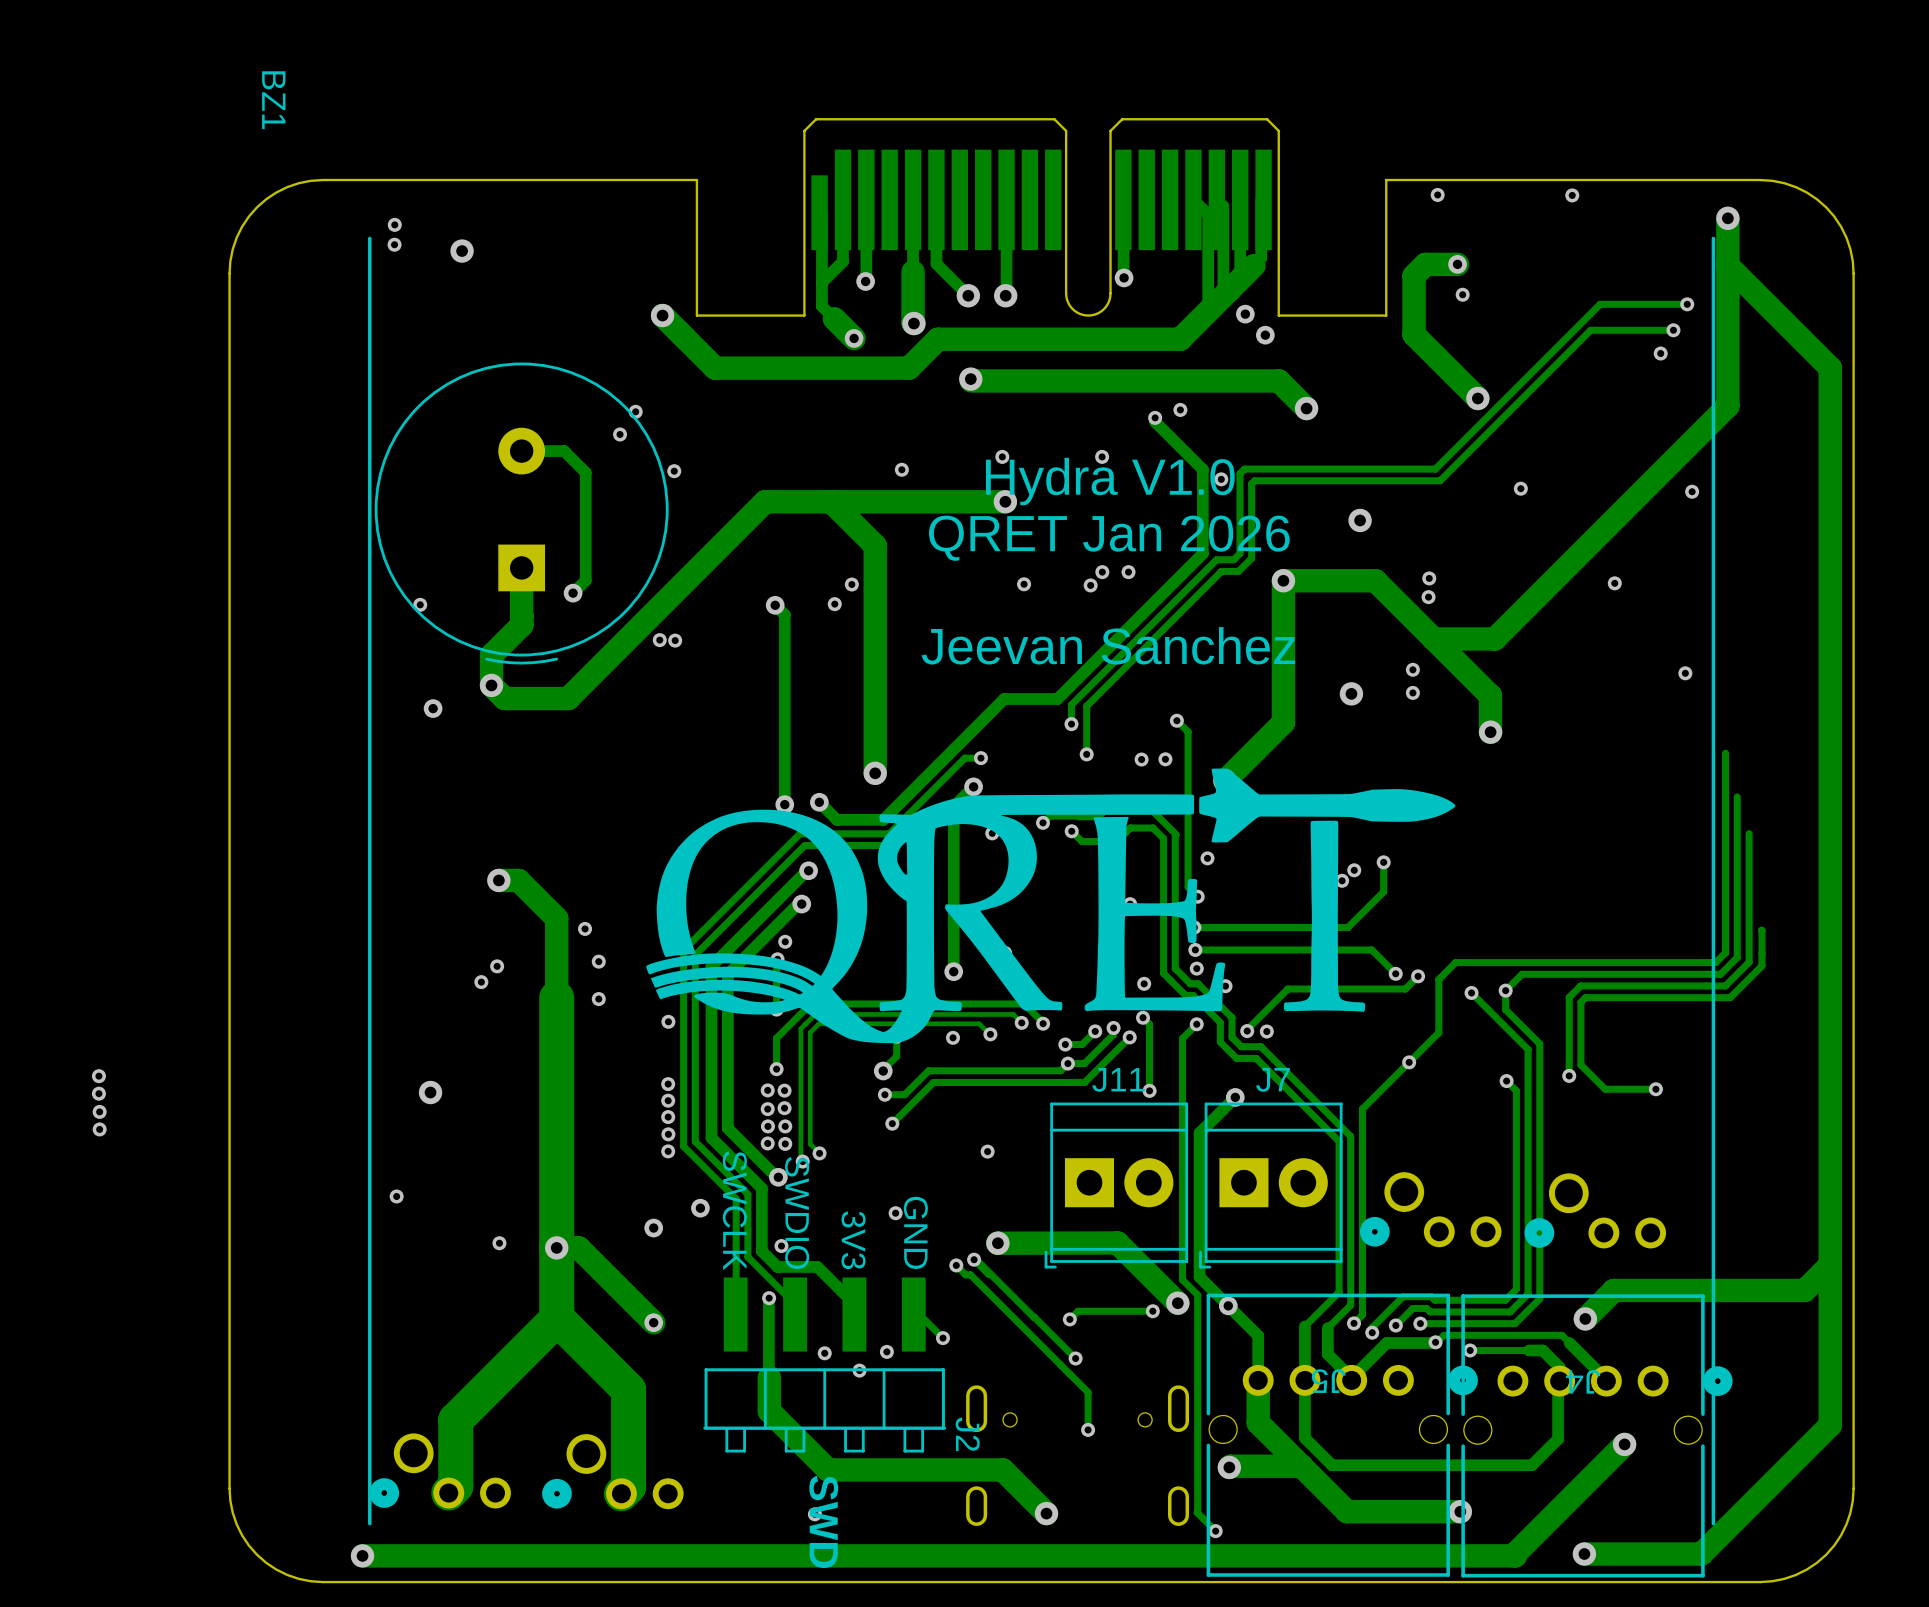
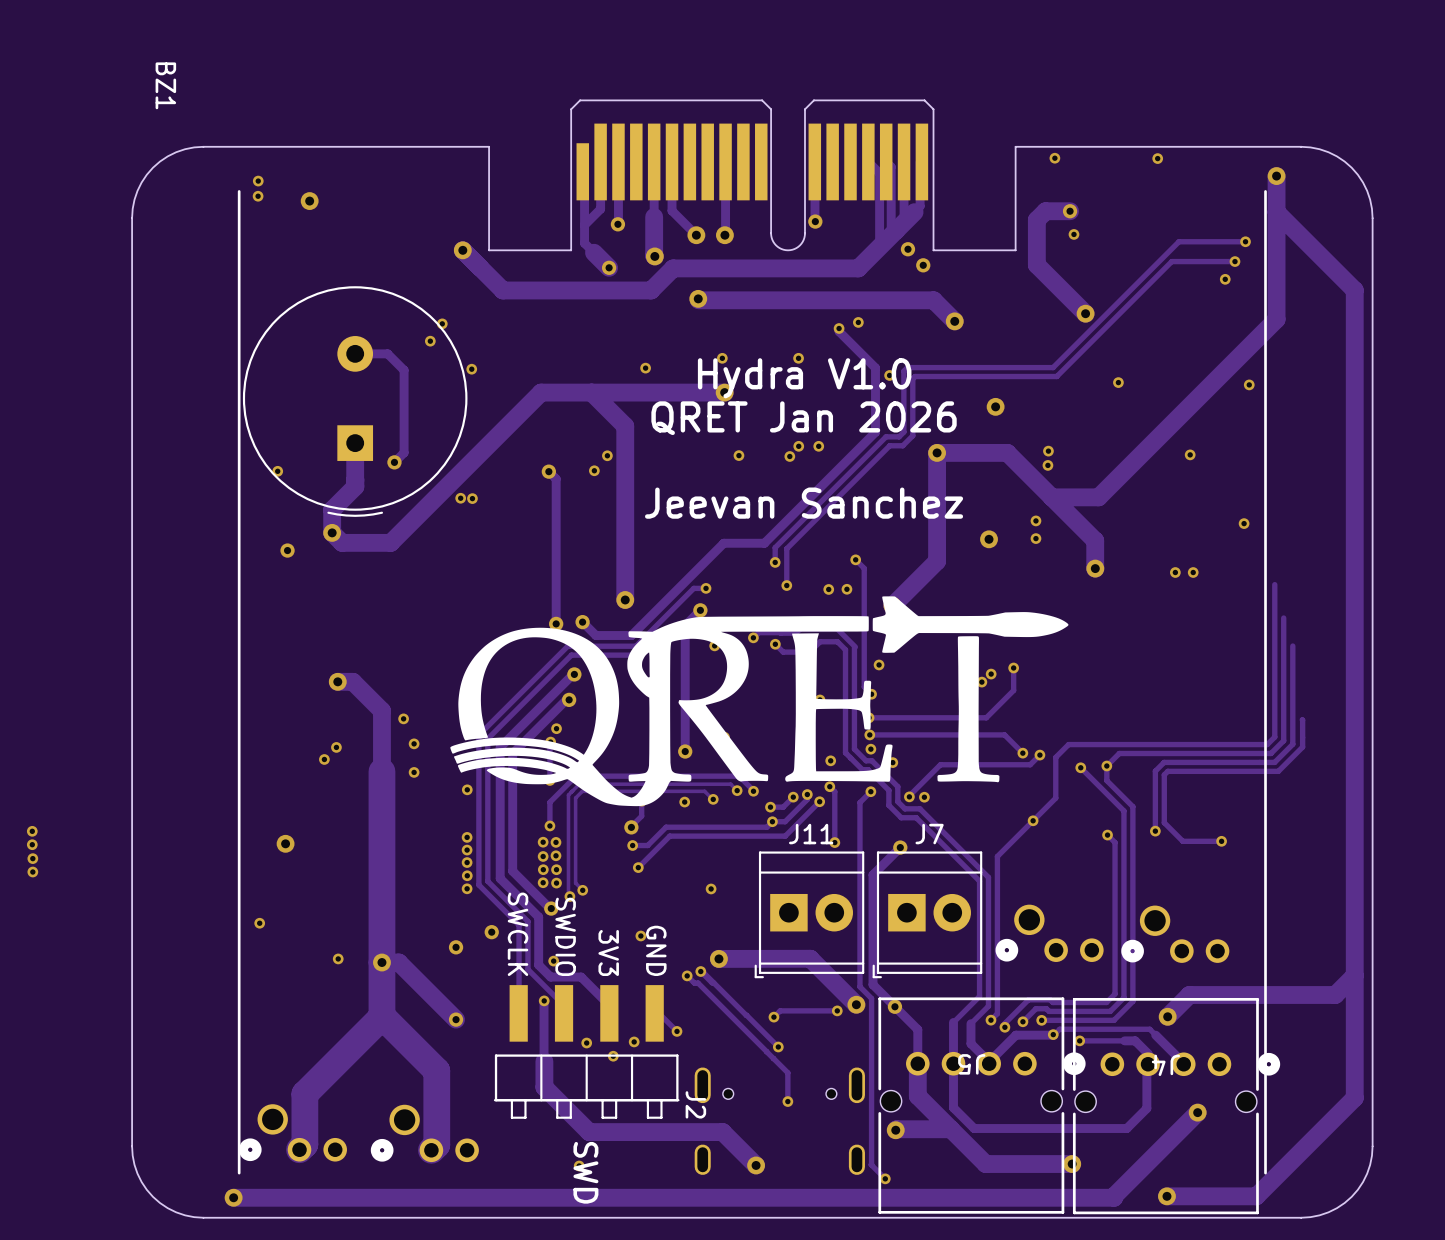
via: none -> (1175, 572)
via: none -> (1193, 572)

